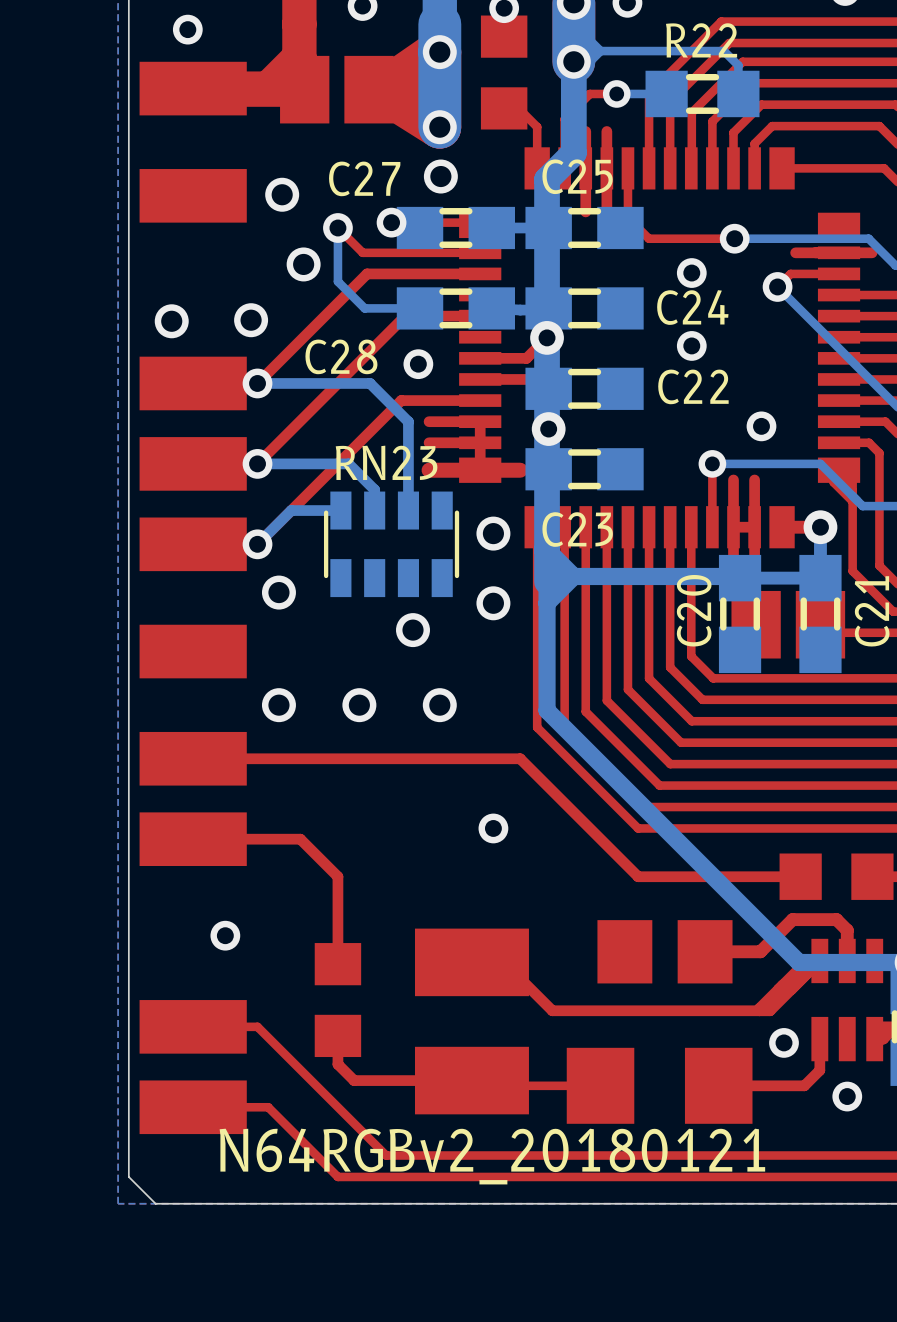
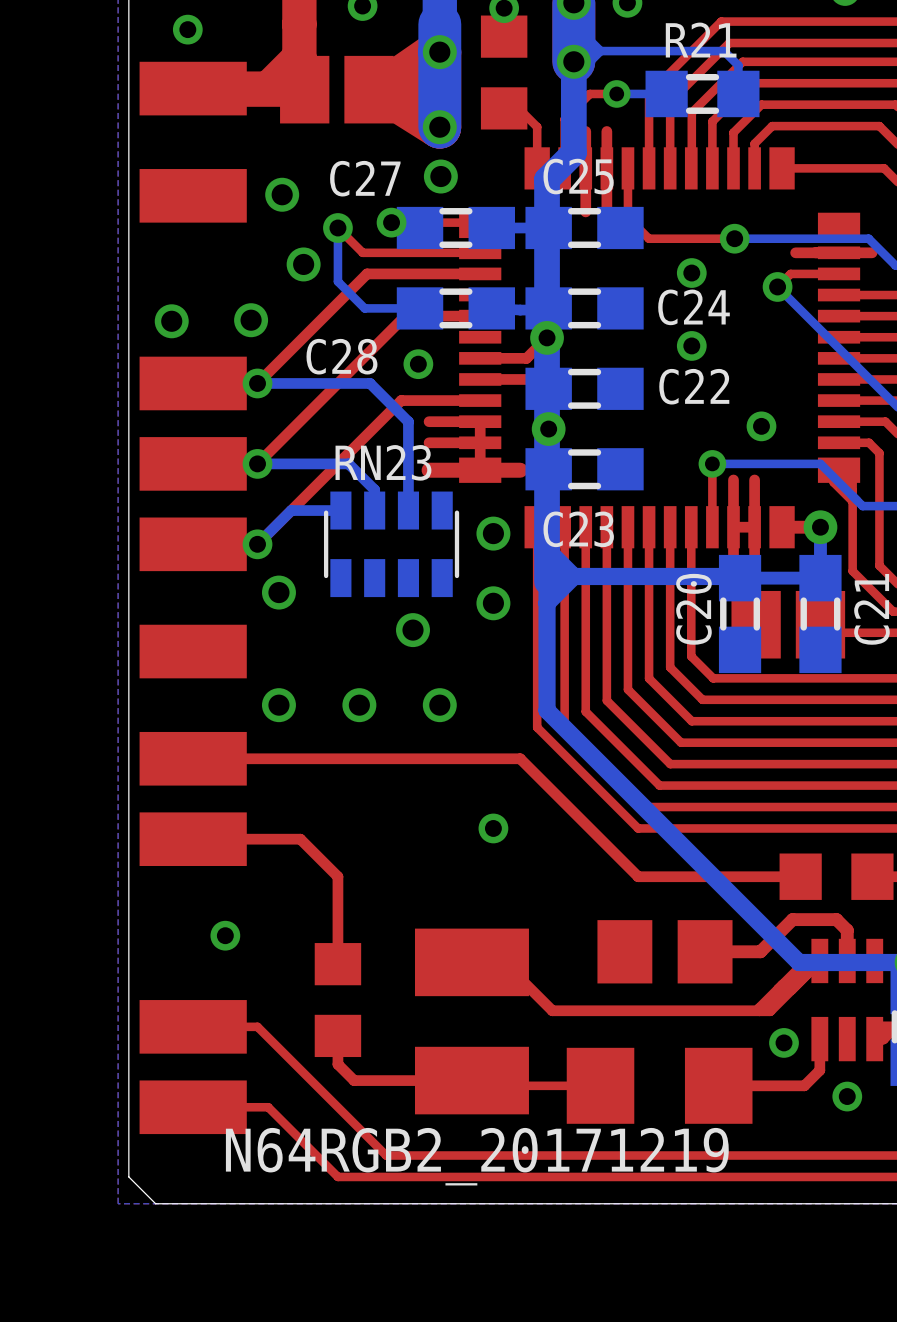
text: R22 (701, 40) -> R21 (701, 40)
text: N64RGBv2_20180121 (492, 1156) -> N64RGB2_20171219 (477, 1156)

